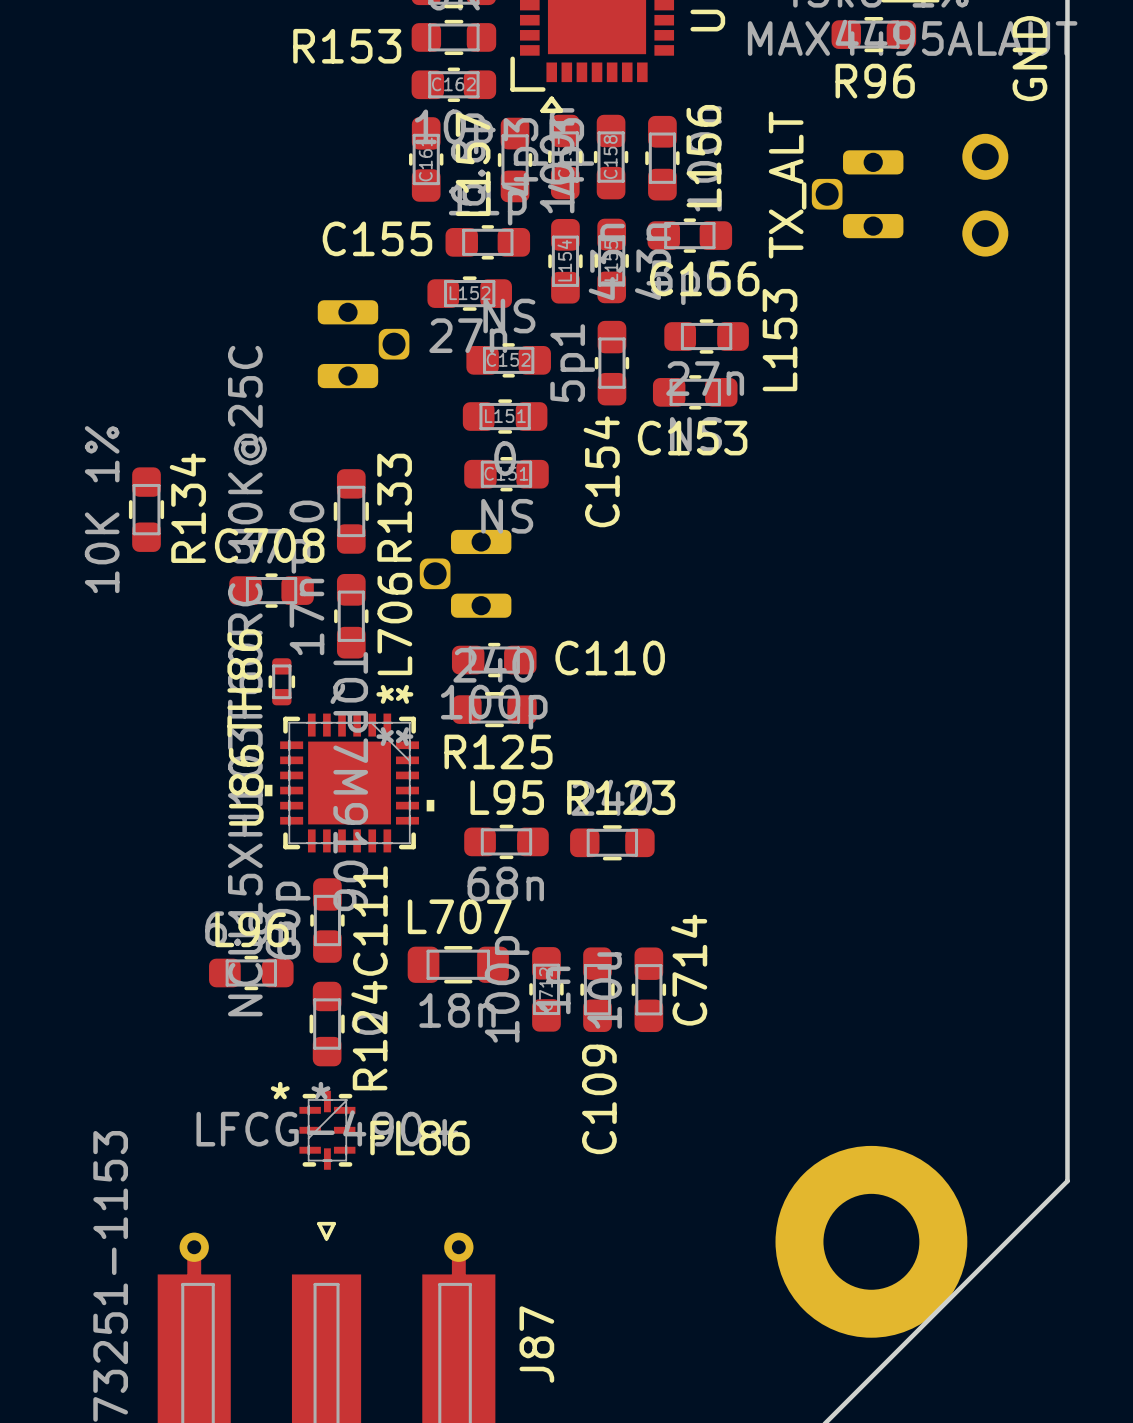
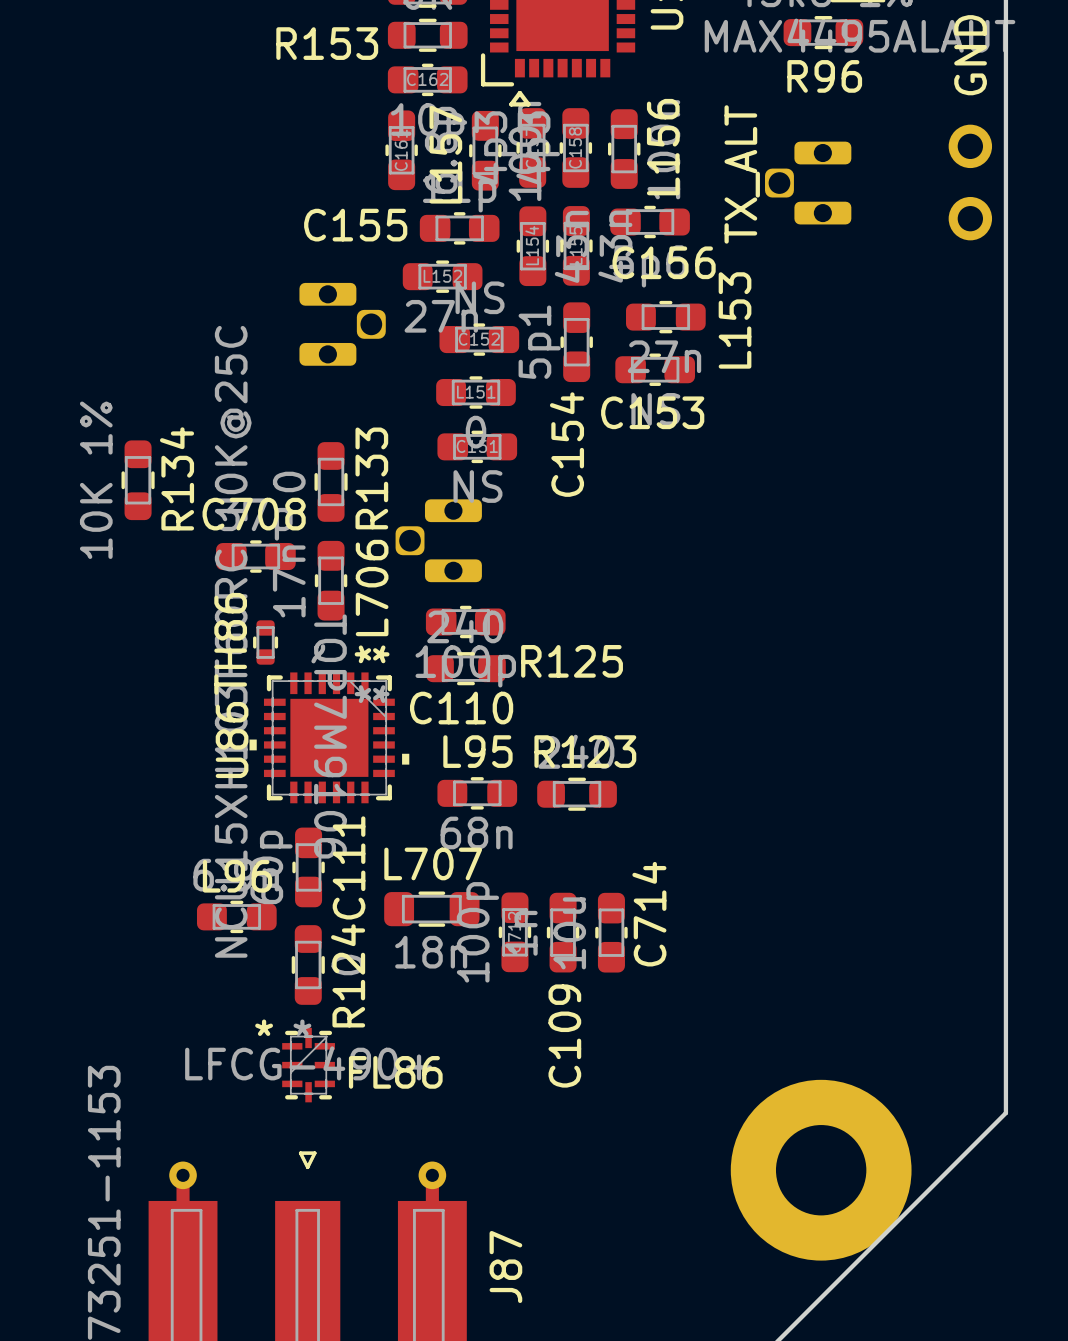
part: none -> (970, 146)
part: (985, 156) -> none
part: none -> (970, 218)
part: (985, 233) -> none
C110 name position: C110 (610, 658) -> C110 (461, 708)
R125 name position: R125 (498, 751) -> R125 (572, 661)

